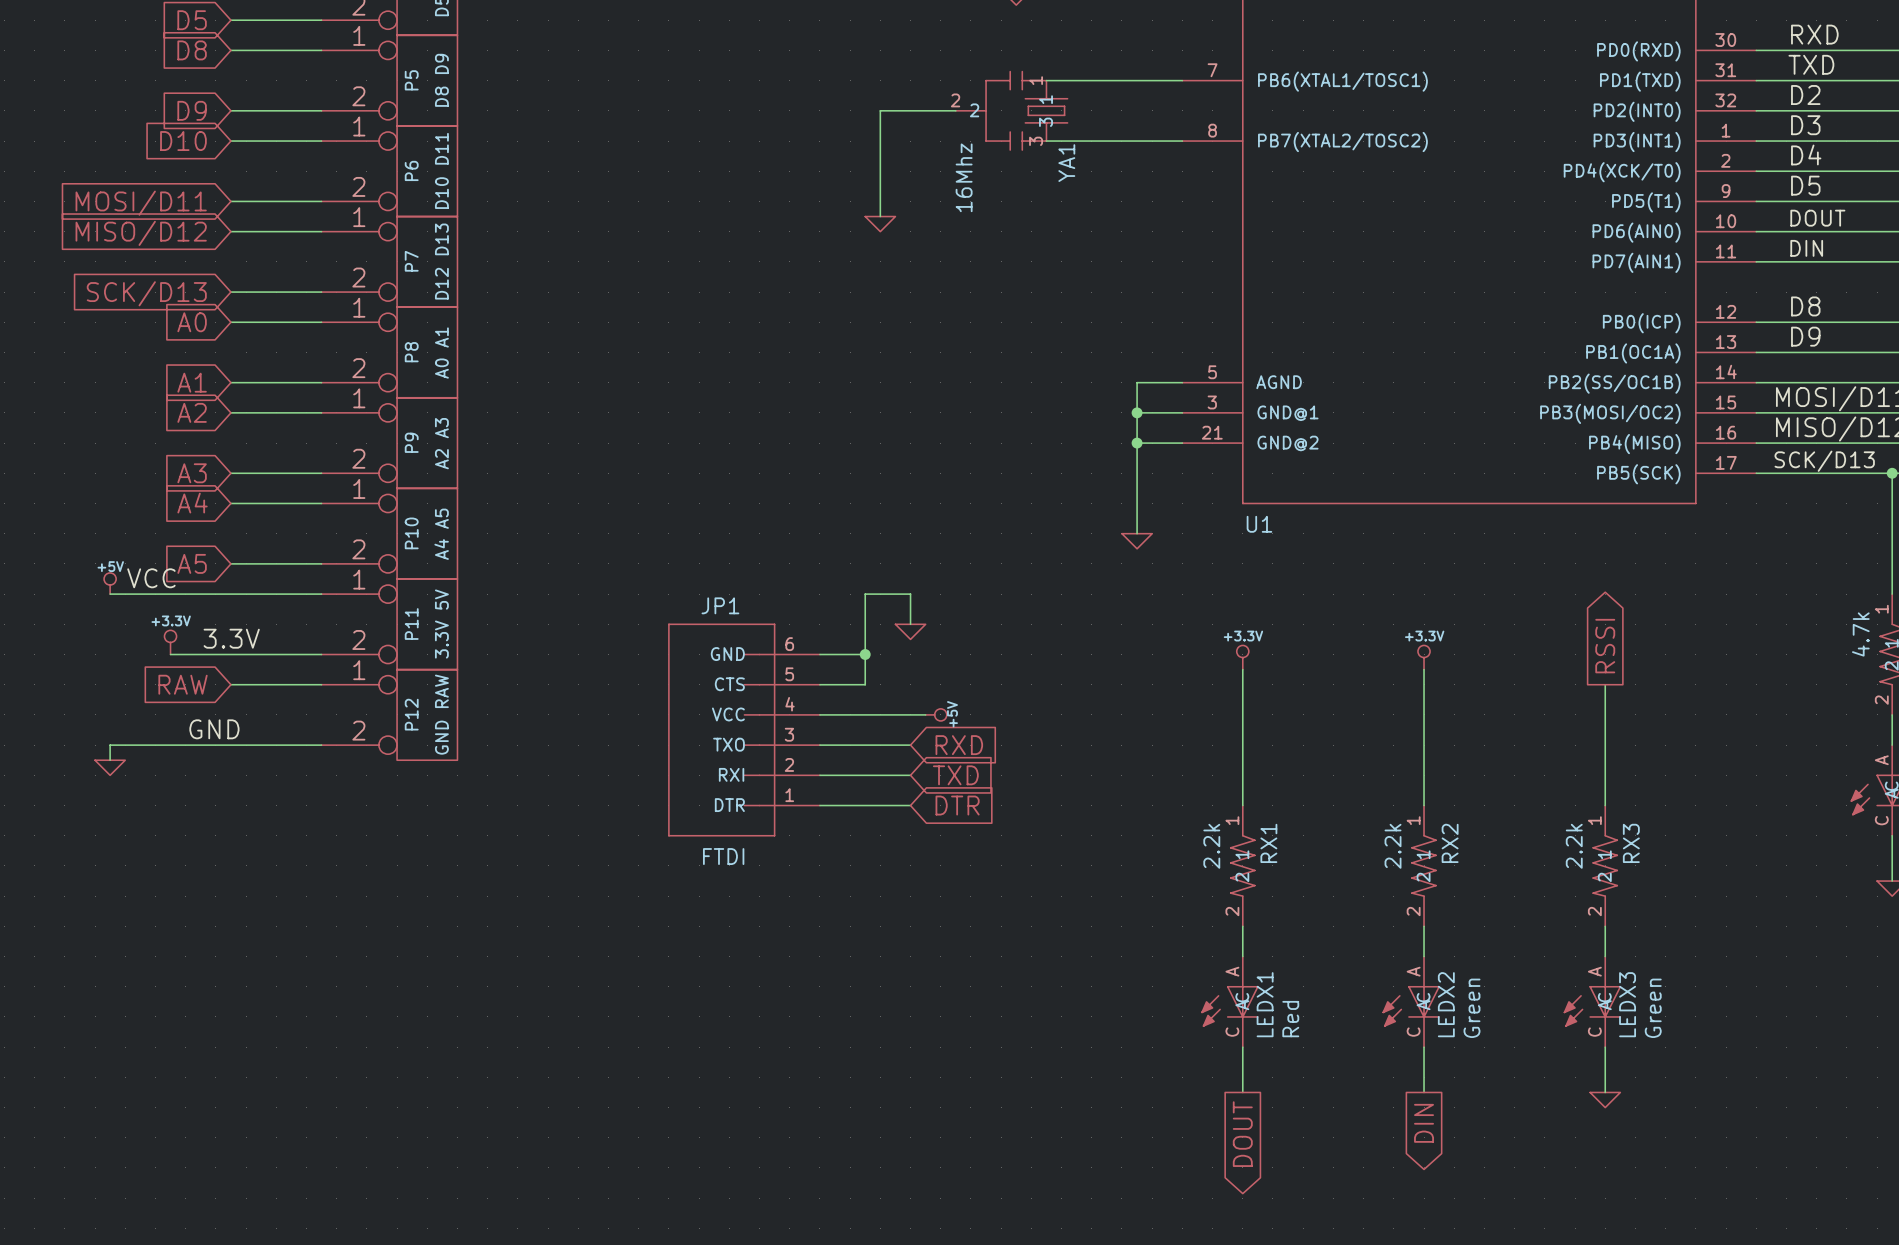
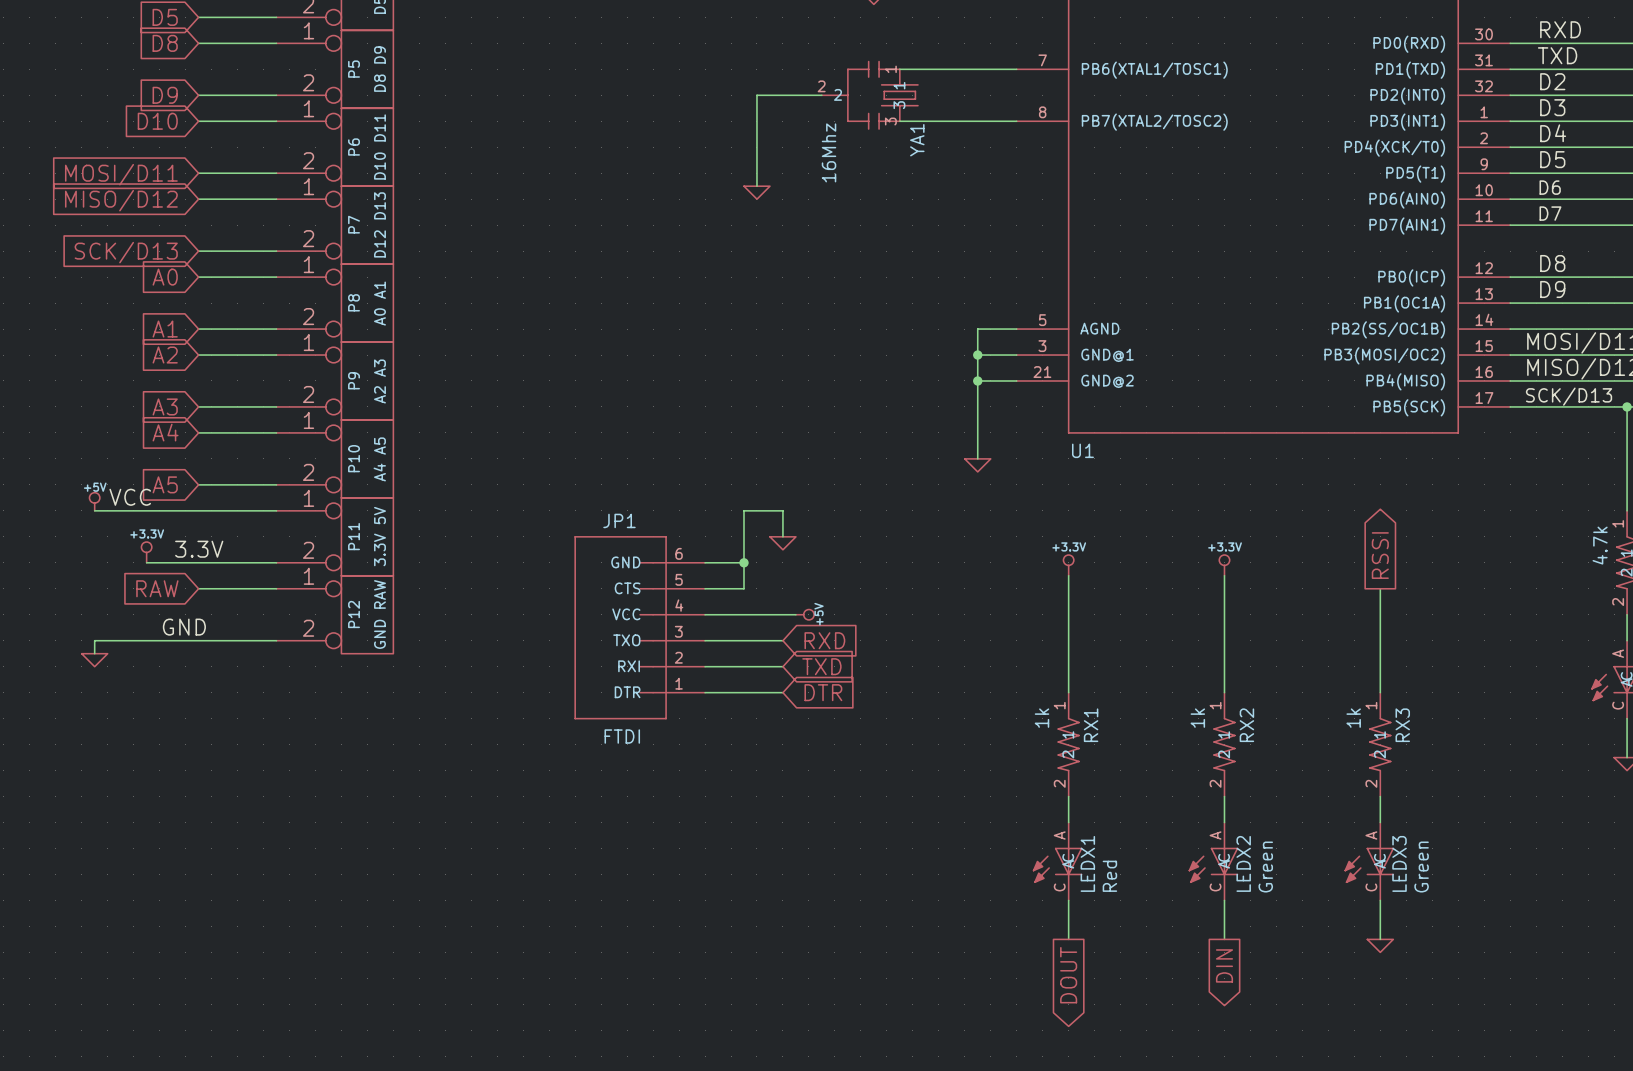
label: DOUT (1817, 218) -> D6 (1550, 187)
label: DIN (1806, 248) -> D7 (1550, 213)
RX1 value: 2.2k (1211, 846) -> 1k (1041, 718)
RX2 value: 2.2k (1393, 846) -> 1k (1197, 718)
RX3 value: 2.2k (1574, 846) -> 1k (1353, 718)

